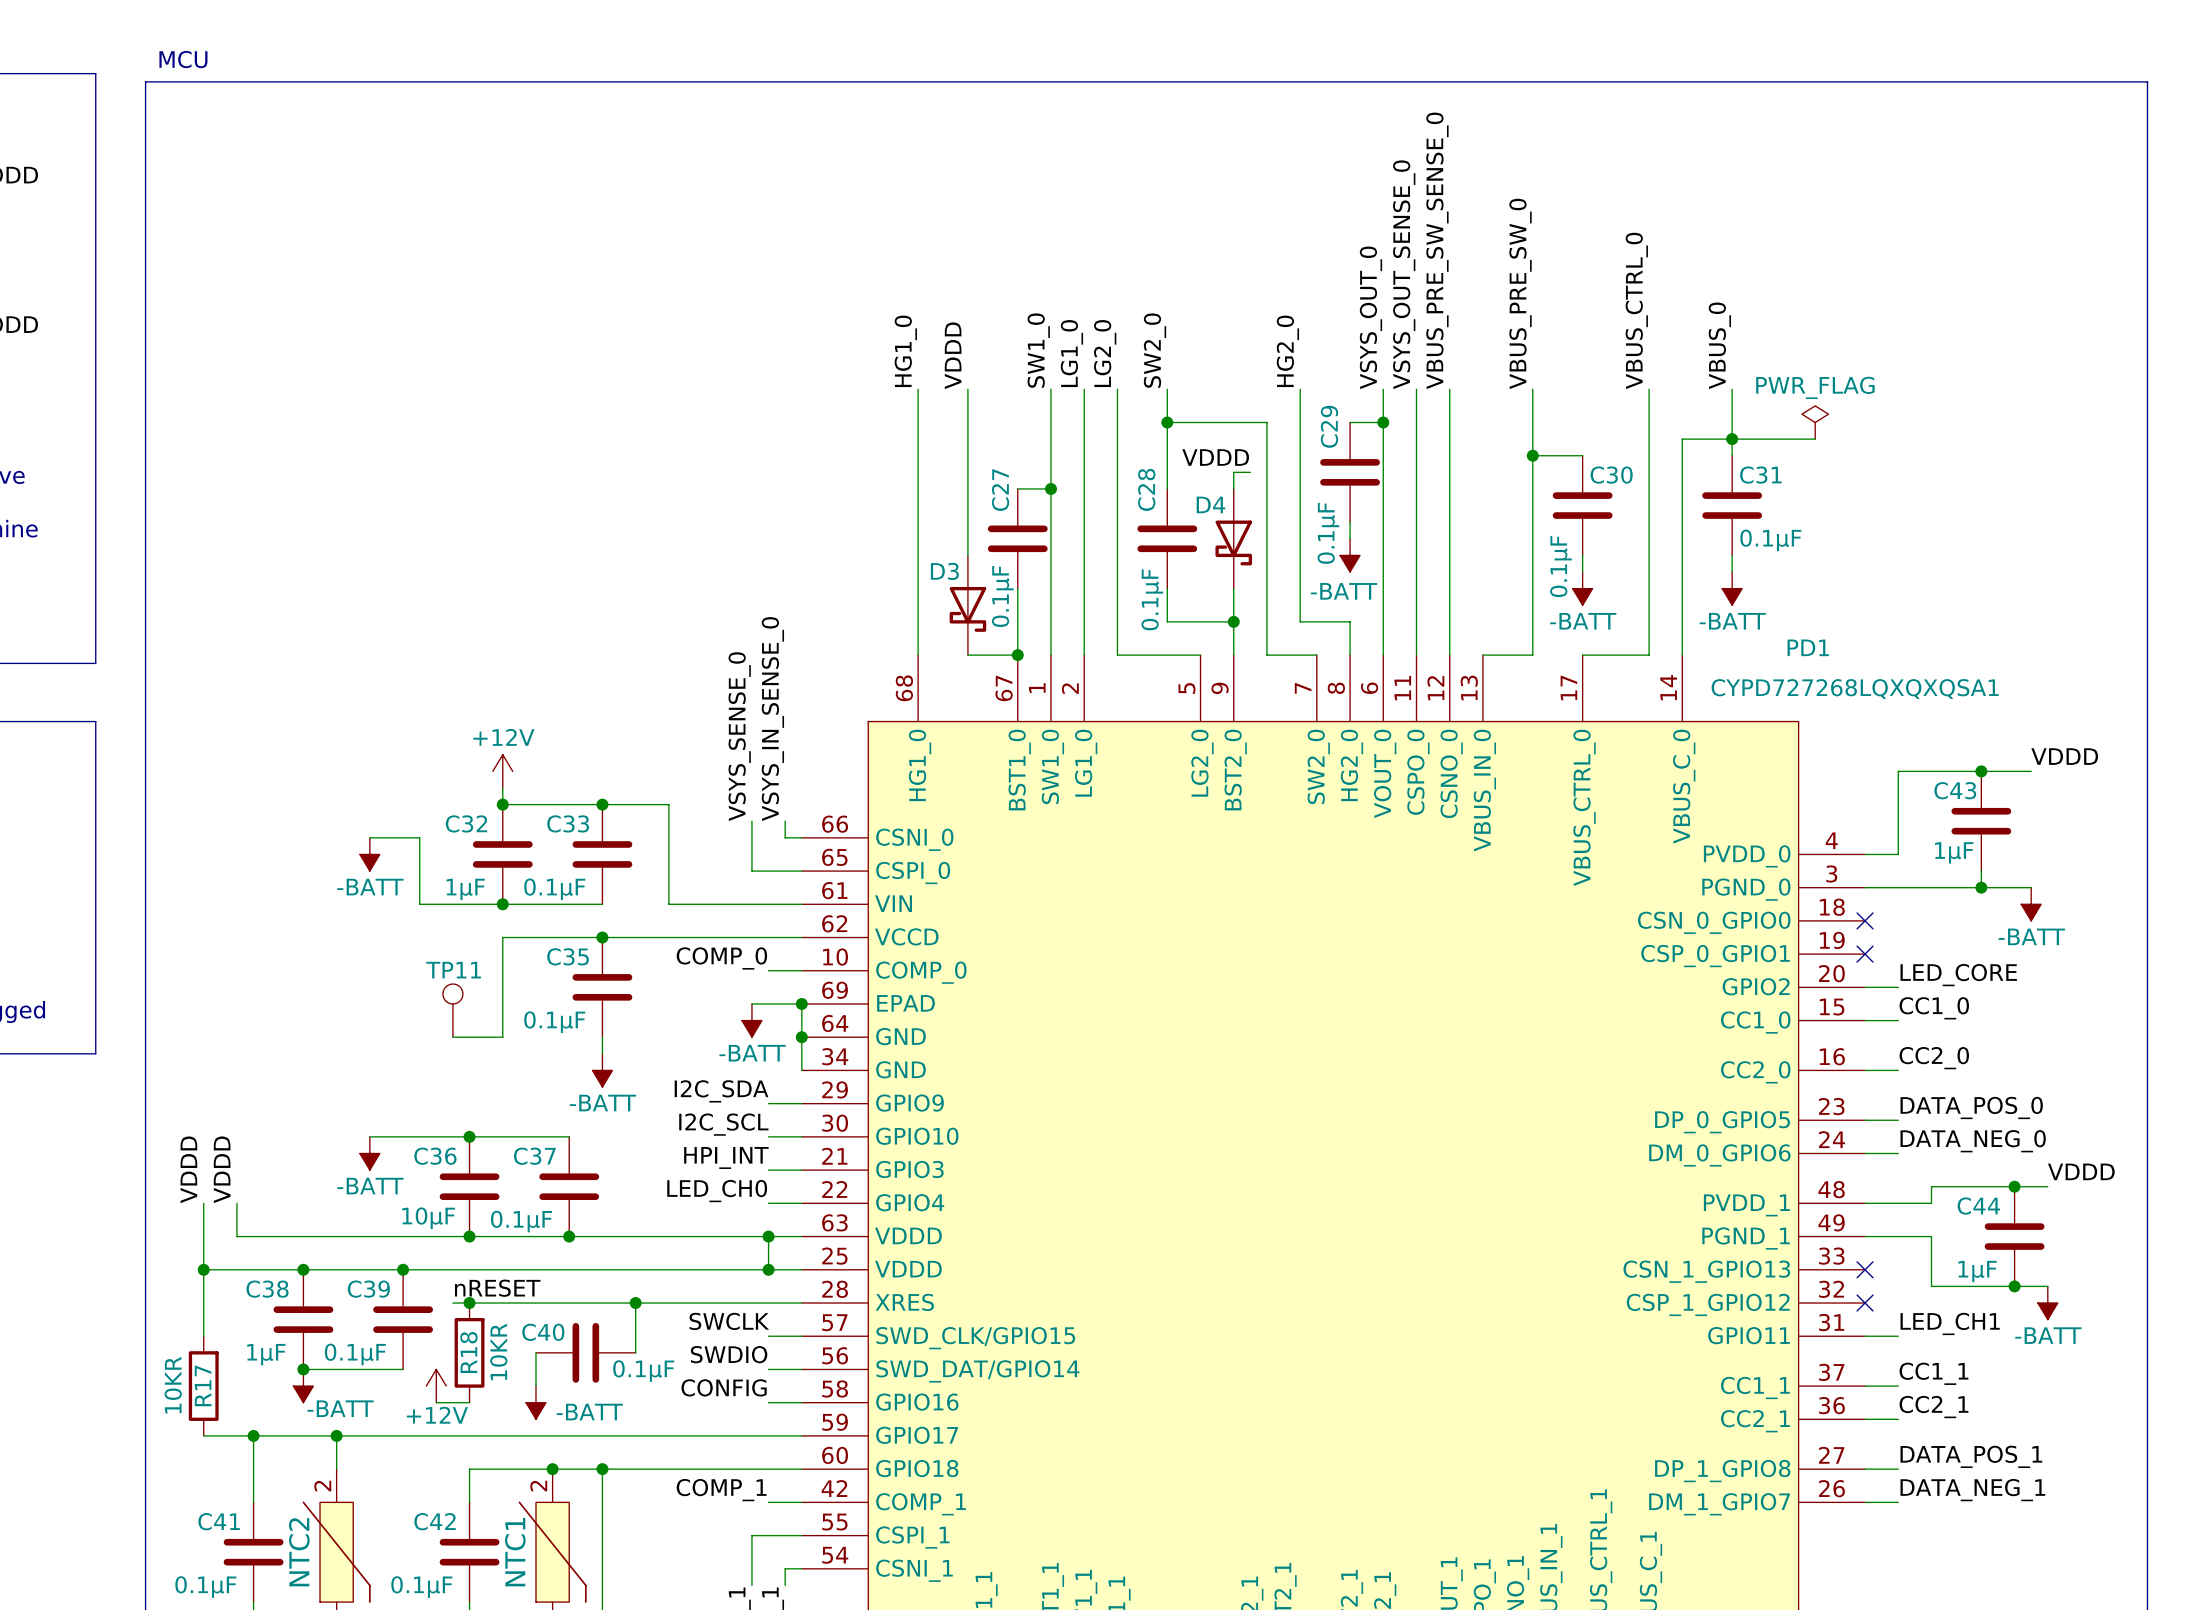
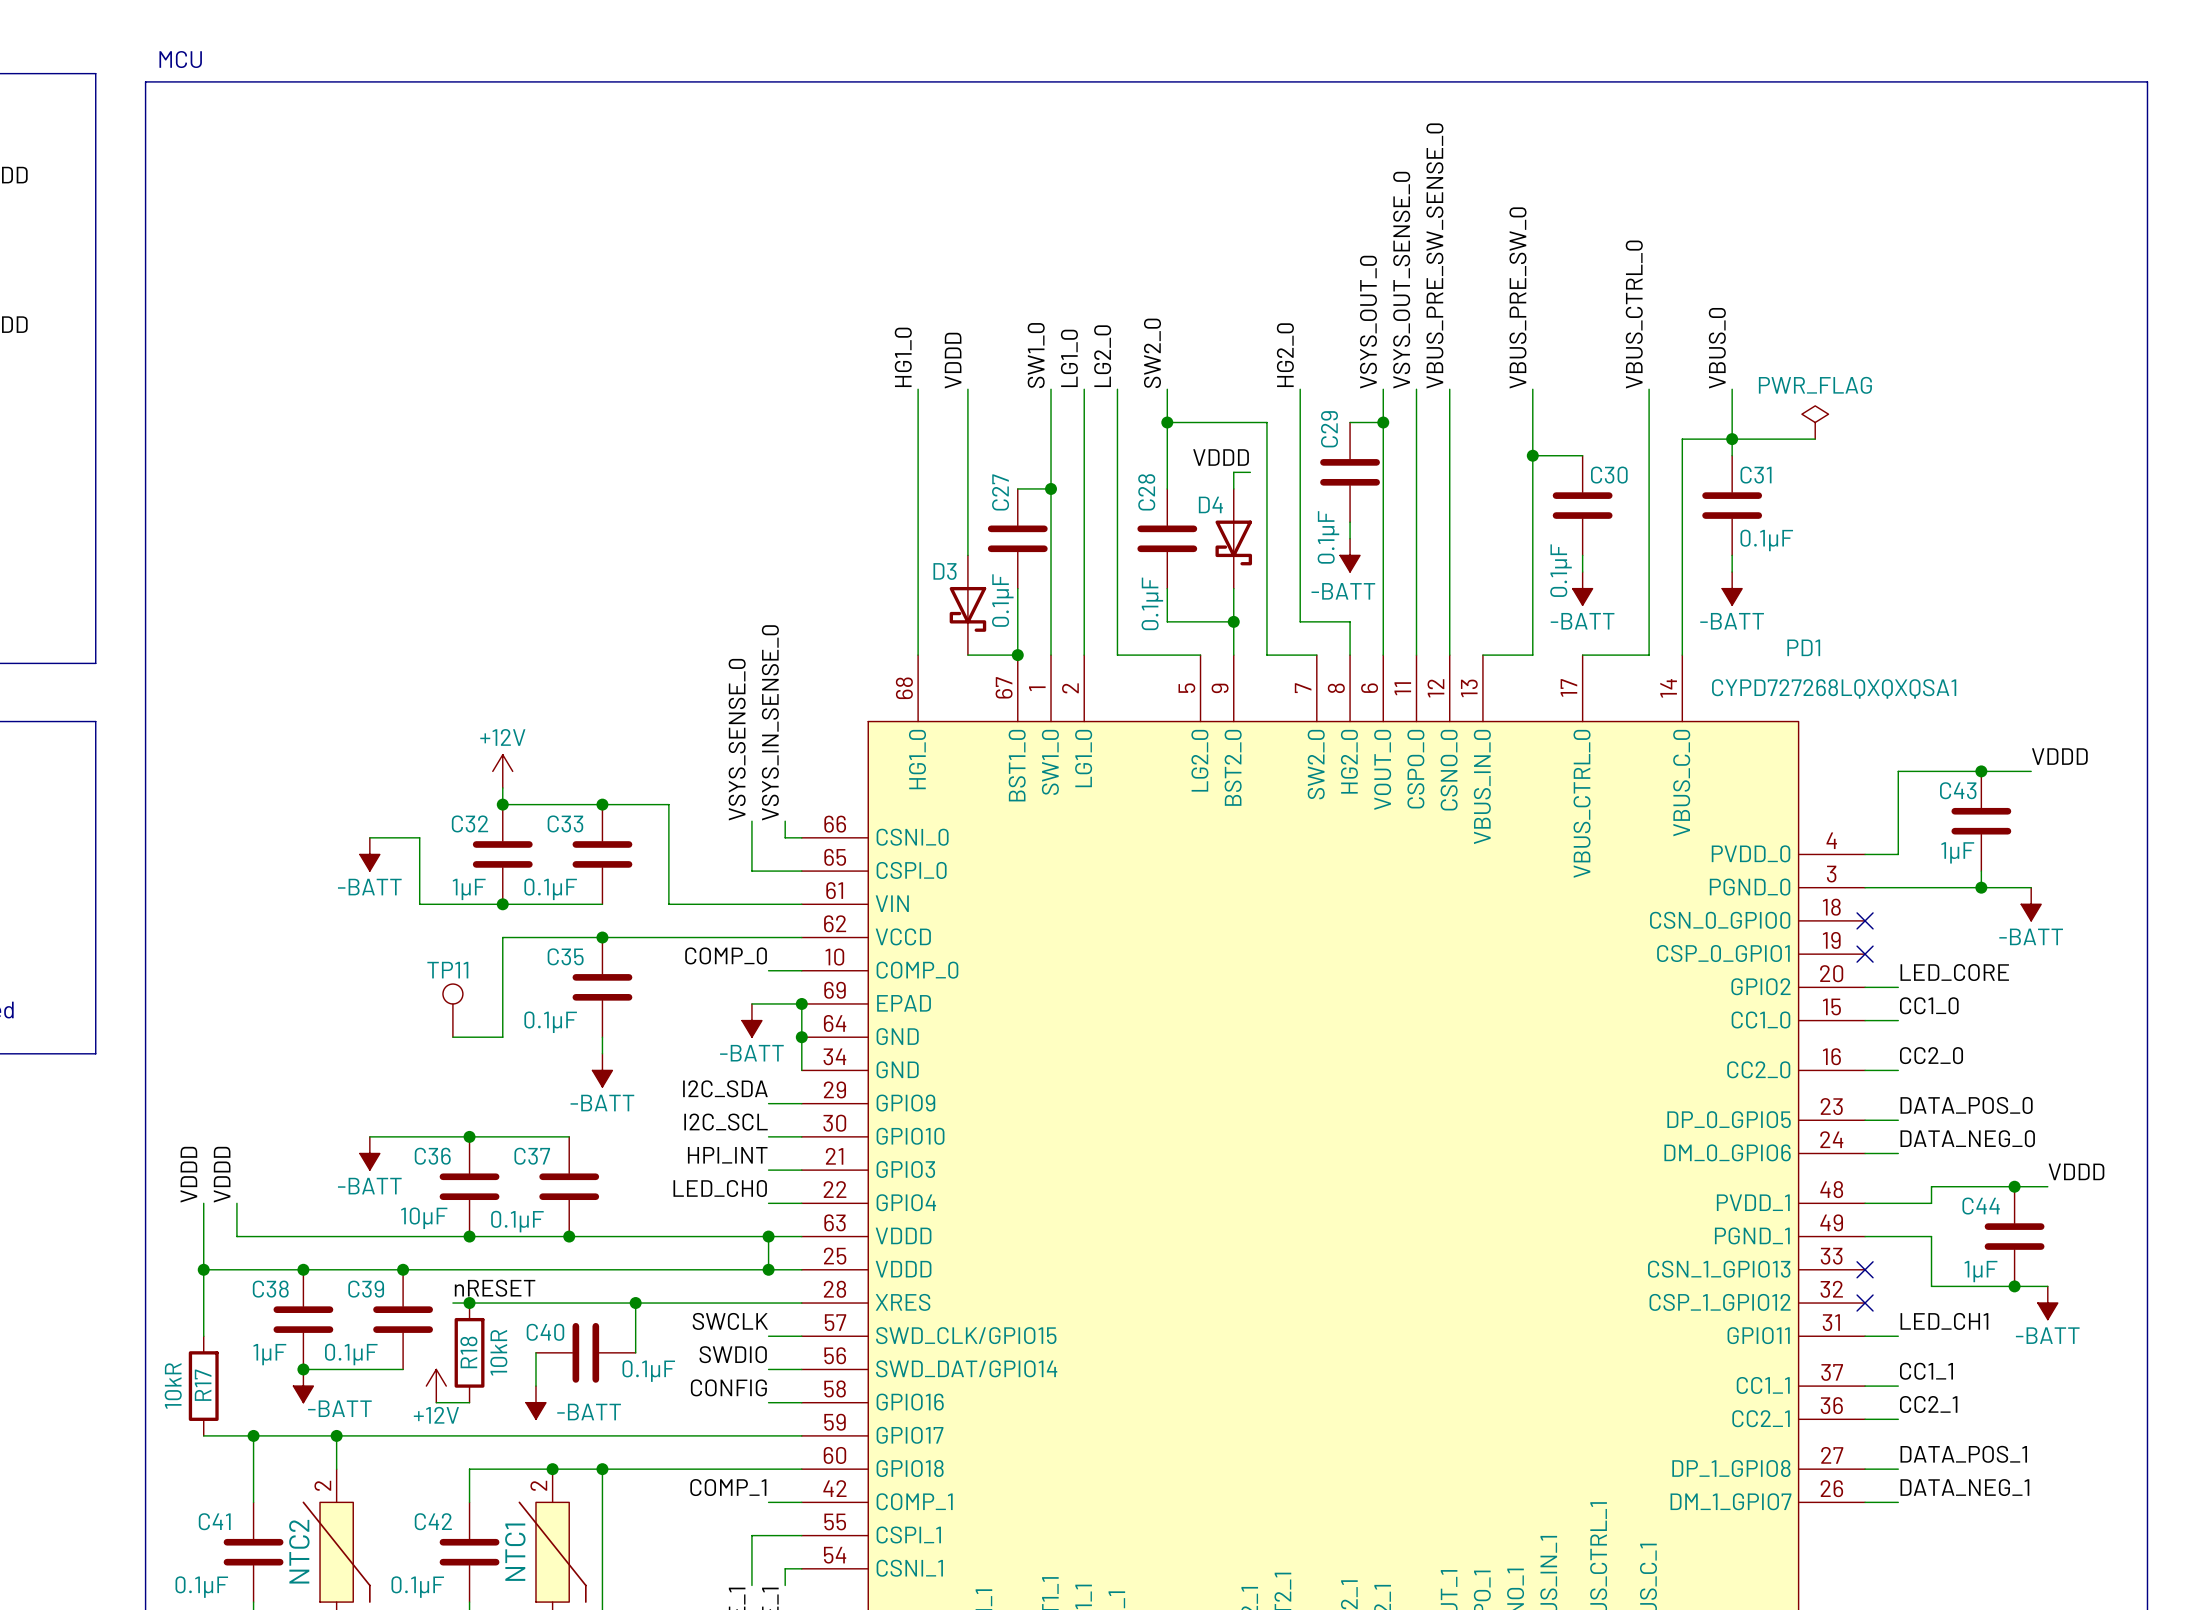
R18 value: 10KR (498, 1351) -> 10kR (498, 1352)
R17 value: 10KR (173, 1385) -> 10kR (173, 1385)

